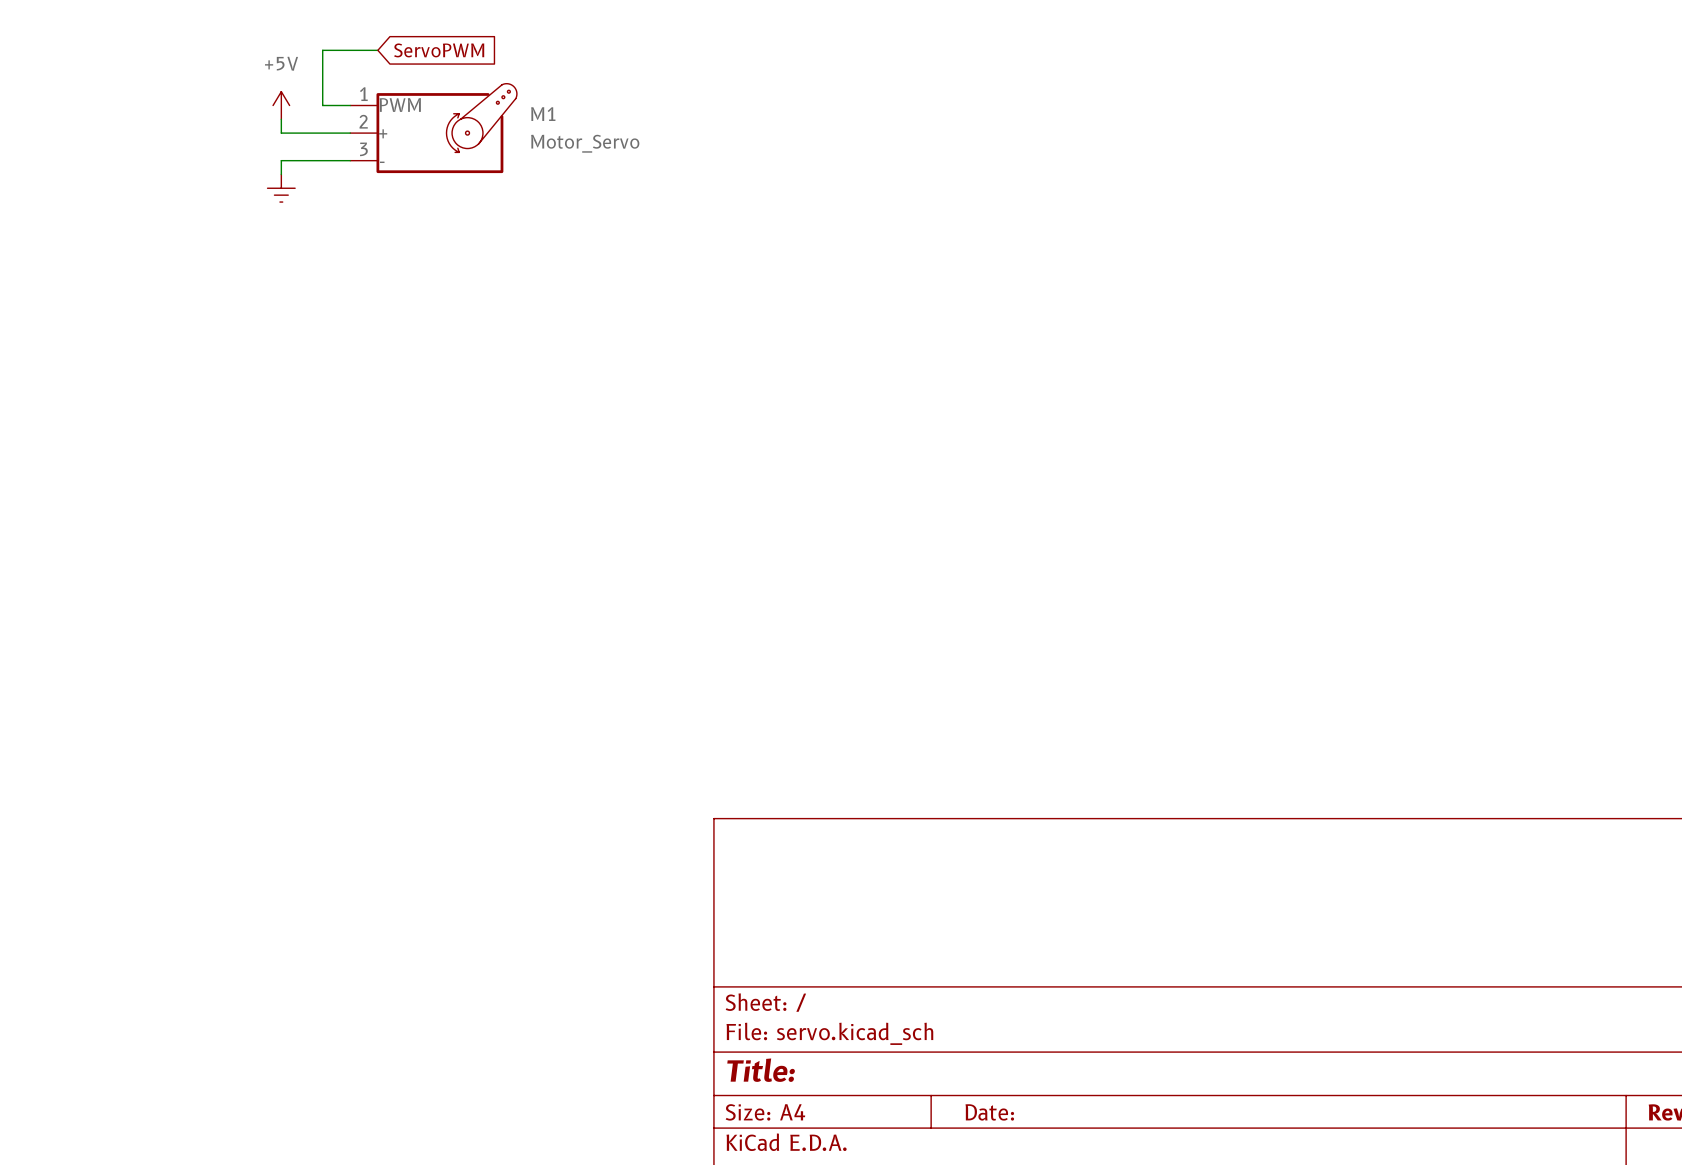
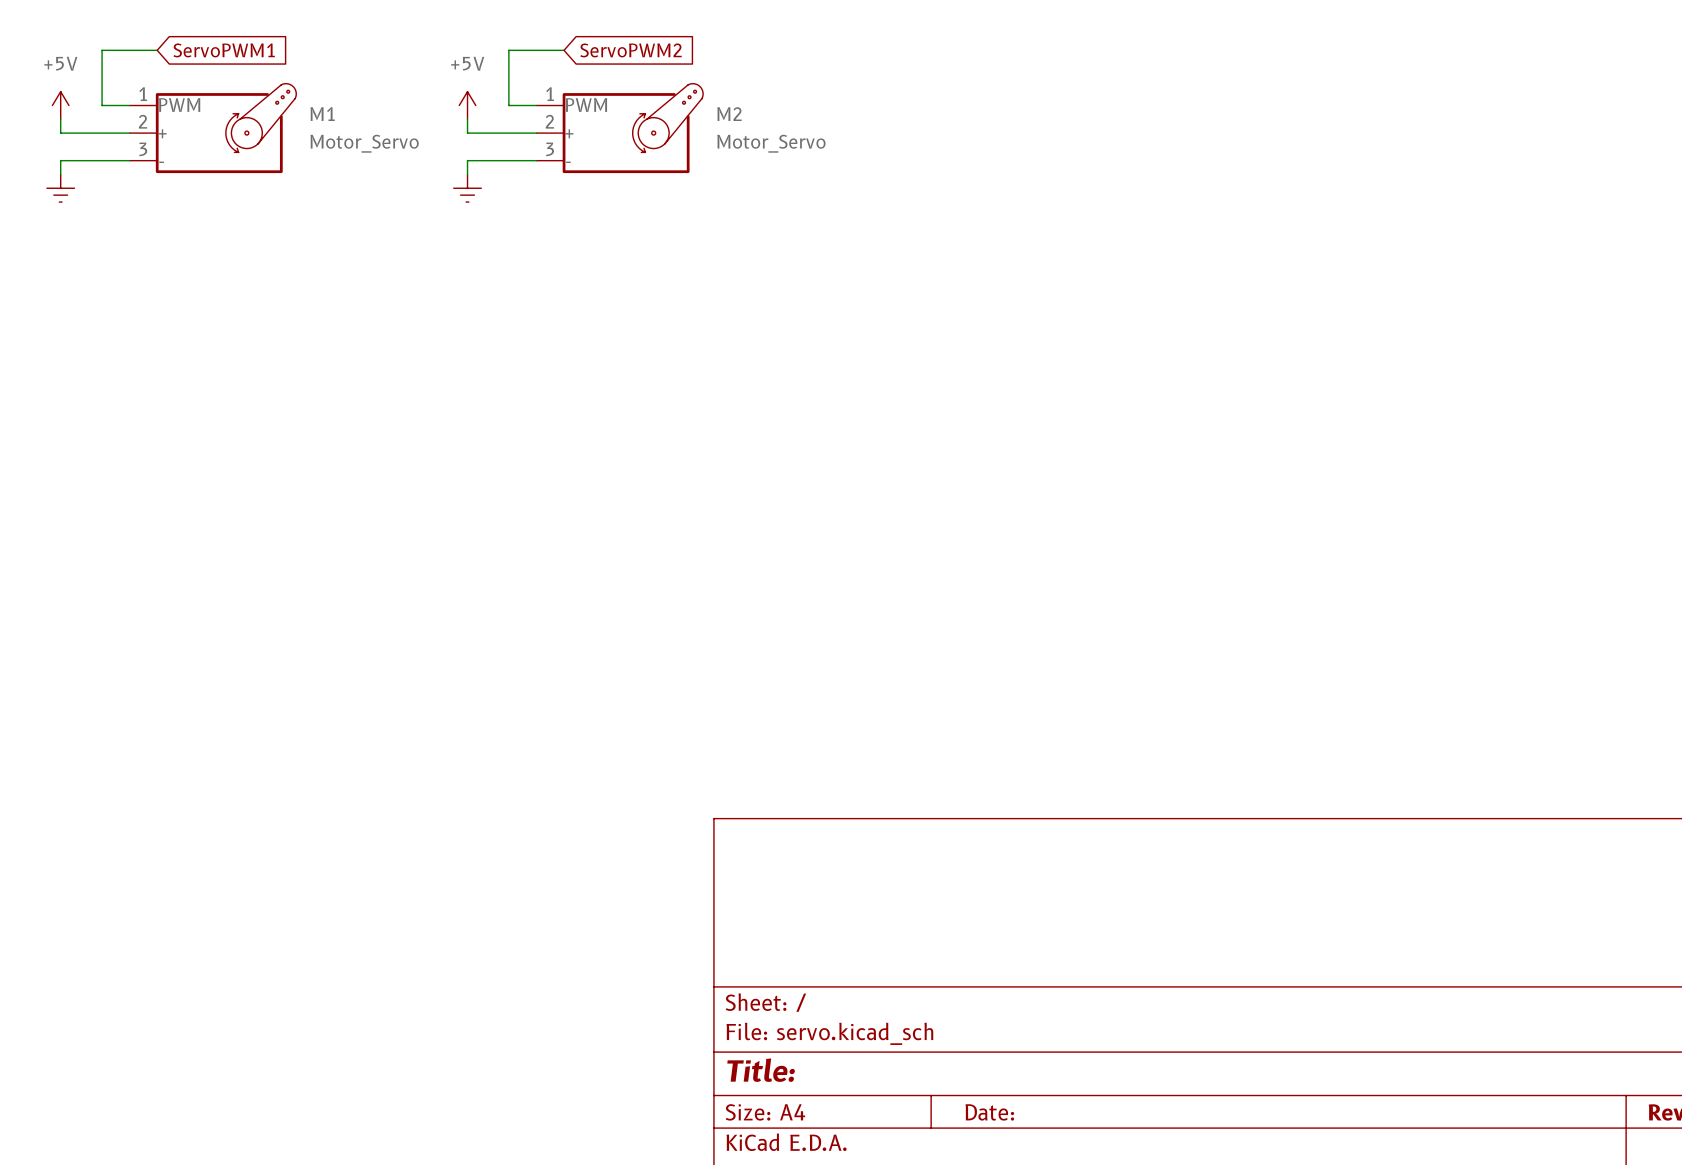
wire: none -> (157, 50) (102, 50) (102, 105) (129, 105)
global label: none -> ServoPWM1 (224, 50)
wire: (377, 50) (322, 50) (322, 105) (350, 105) -> (564, 50) (508, 50) (508, 105) (536, 105)
global label: ServoPWM (439, 50) -> none
global label: none -> ServoPWM2 (631, 50)
power symbol: none -> +5V (60, 105)
power symbol: +5V (281, 105) -> none
power symbol: none -> +5V (467, 105)
wire: none -> (60, 119) (60, 133) (129, 133)
wire: (281, 119) (281, 133) (350, 133) -> (467, 119) (467, 133) (536, 133)
M1 position: (433, 128) -> (212, 128)
M2: none -> Motor_Servo (619, 128)
wire: none -> (129, 160) (60, 160) (60, 174)
wire: (350, 160) (281, 160) (281, 174) -> (536, 160) (467, 160) (467, 174)
power symbol: none -> (60, 188)
power symbol: (281, 188) -> none
power symbol: none -> (467, 188)

